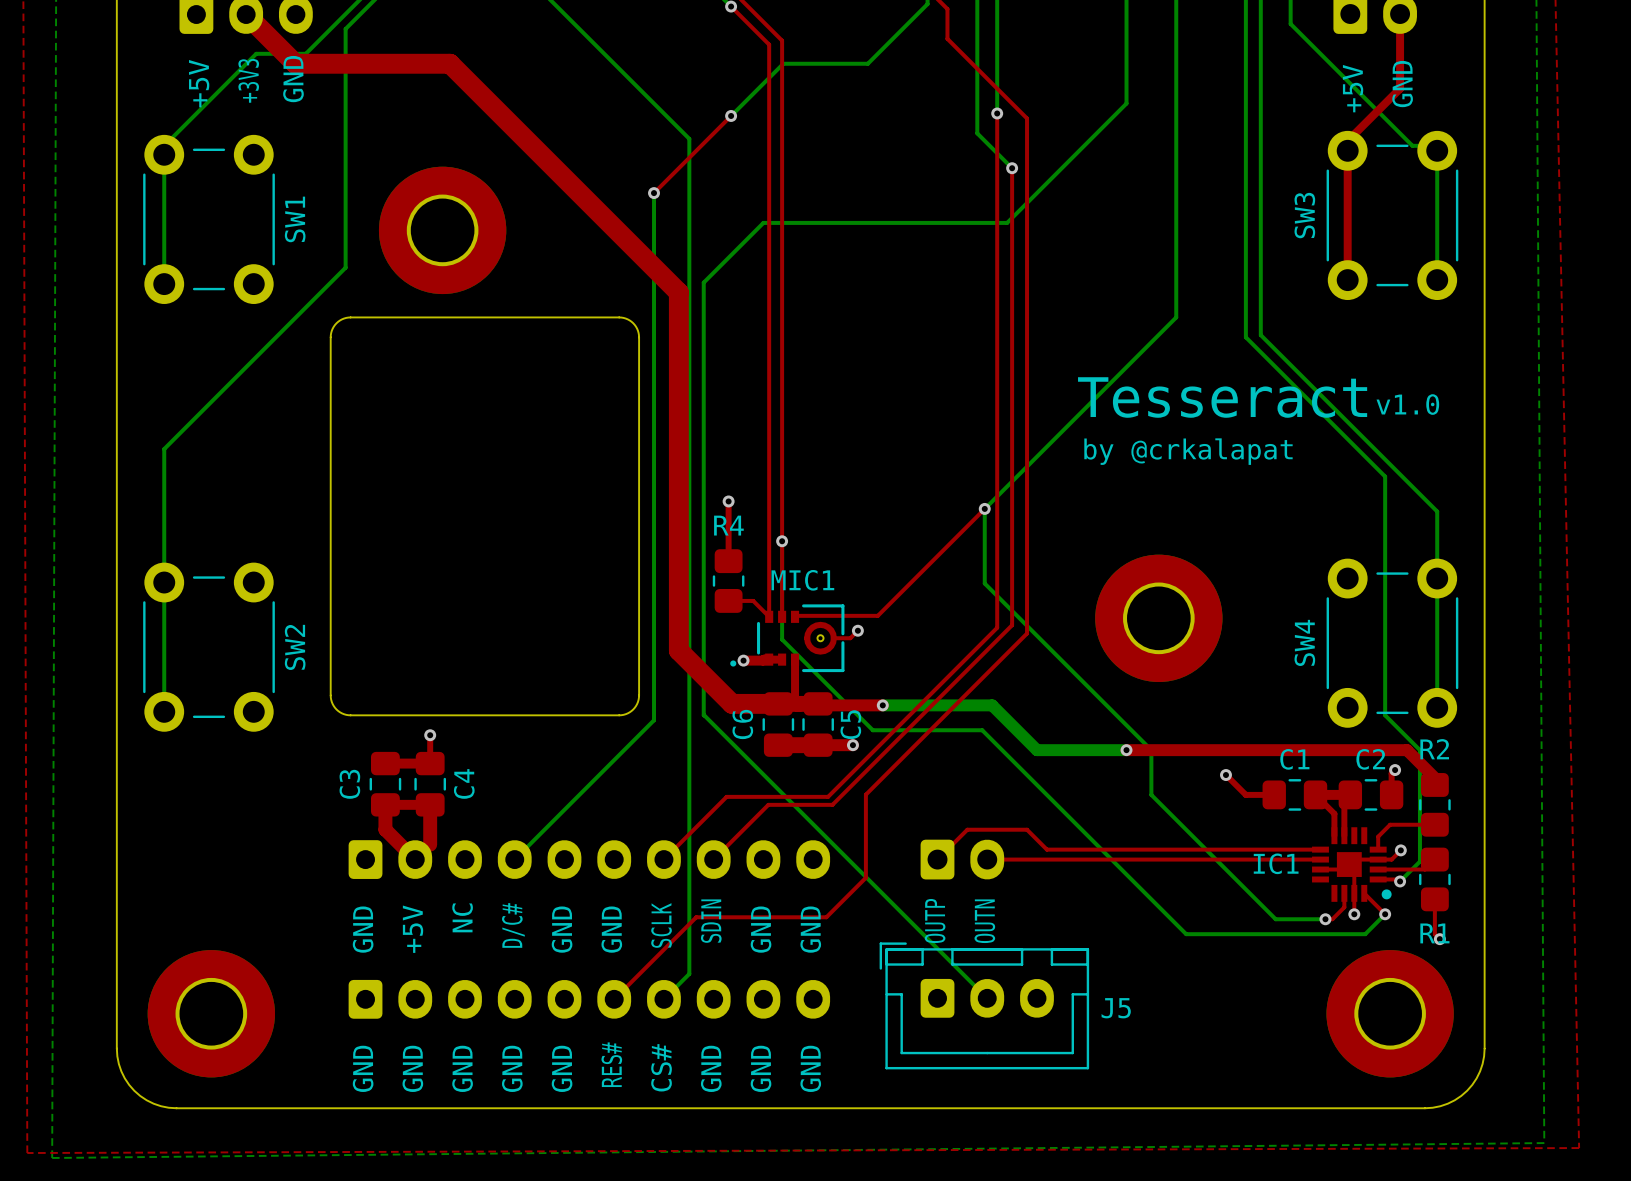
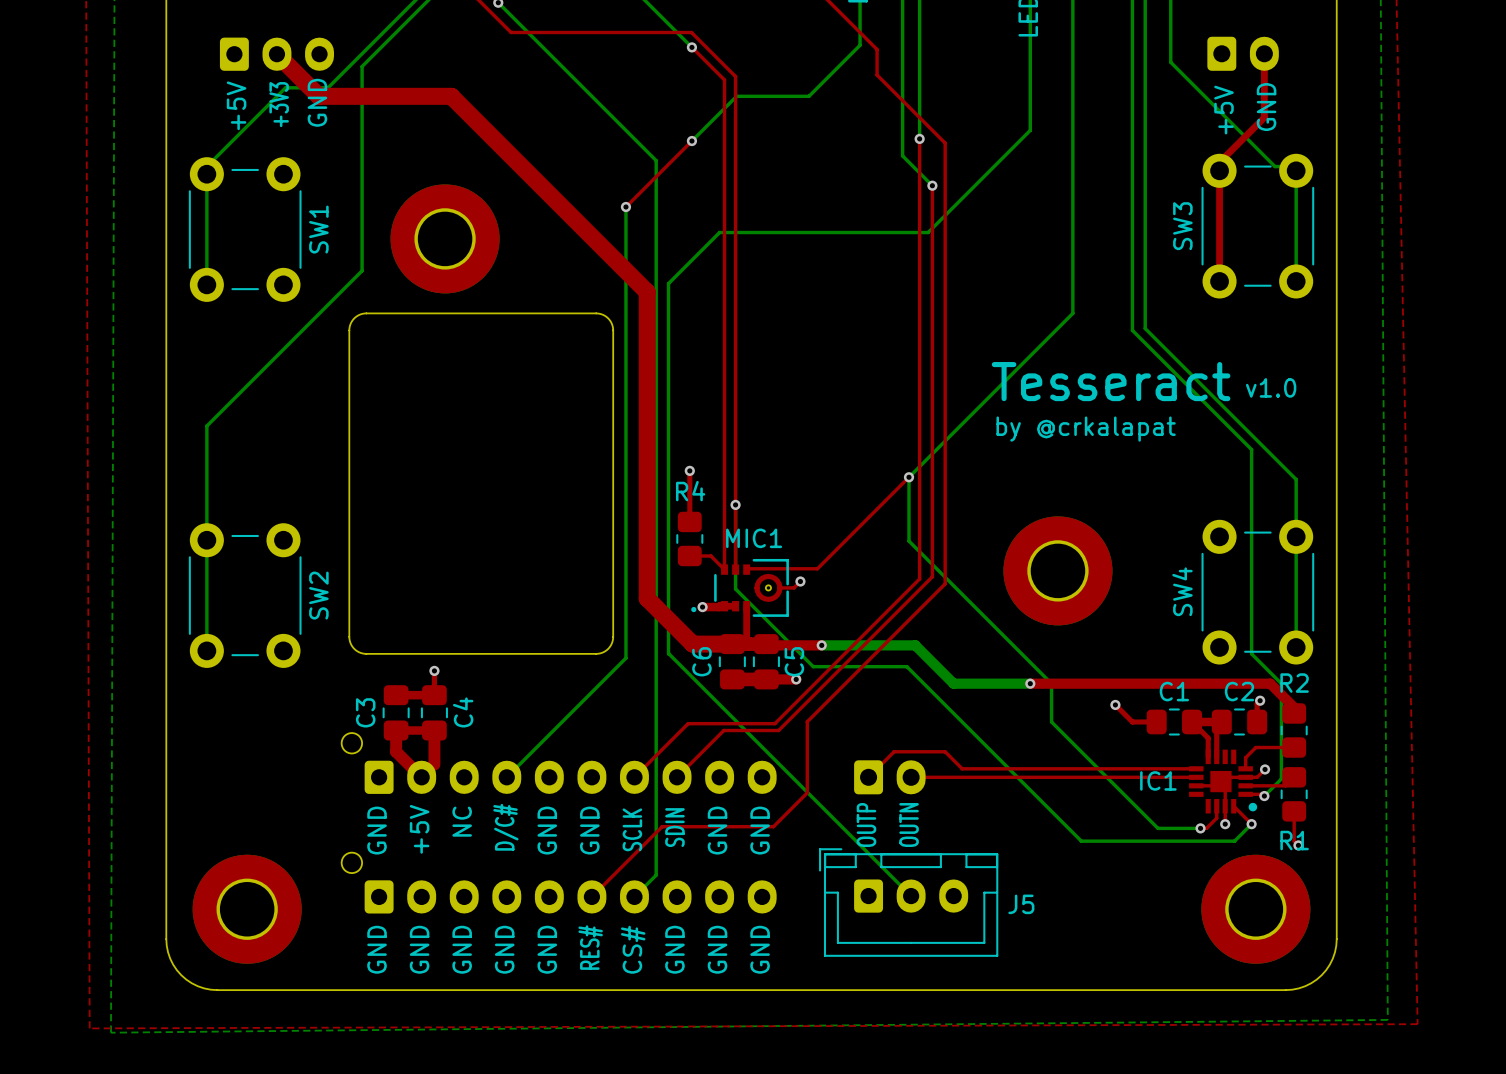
part: none -> (559, 763)
part: none -> (559, 883)

